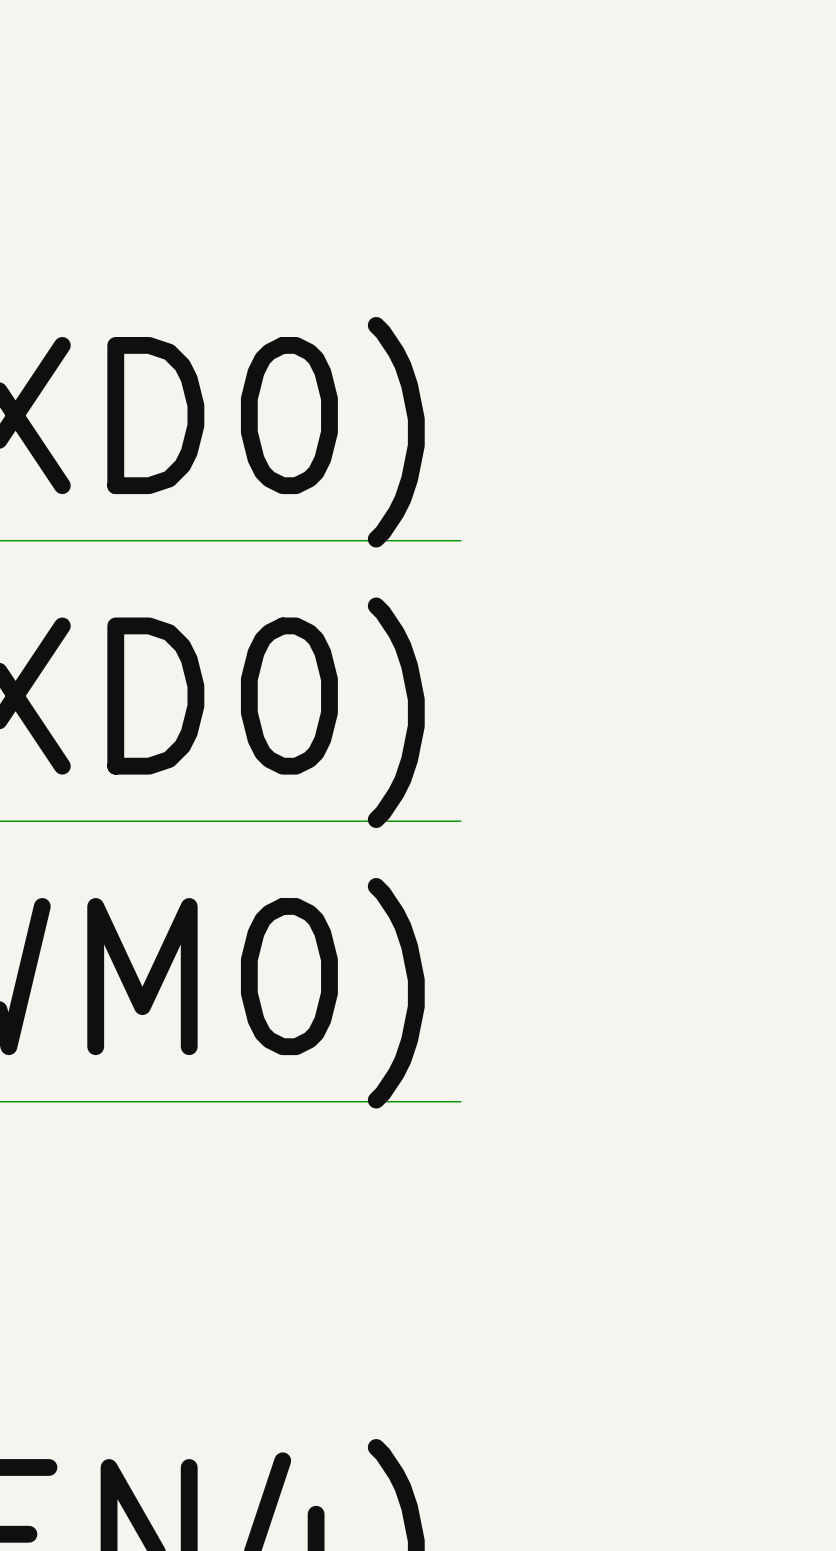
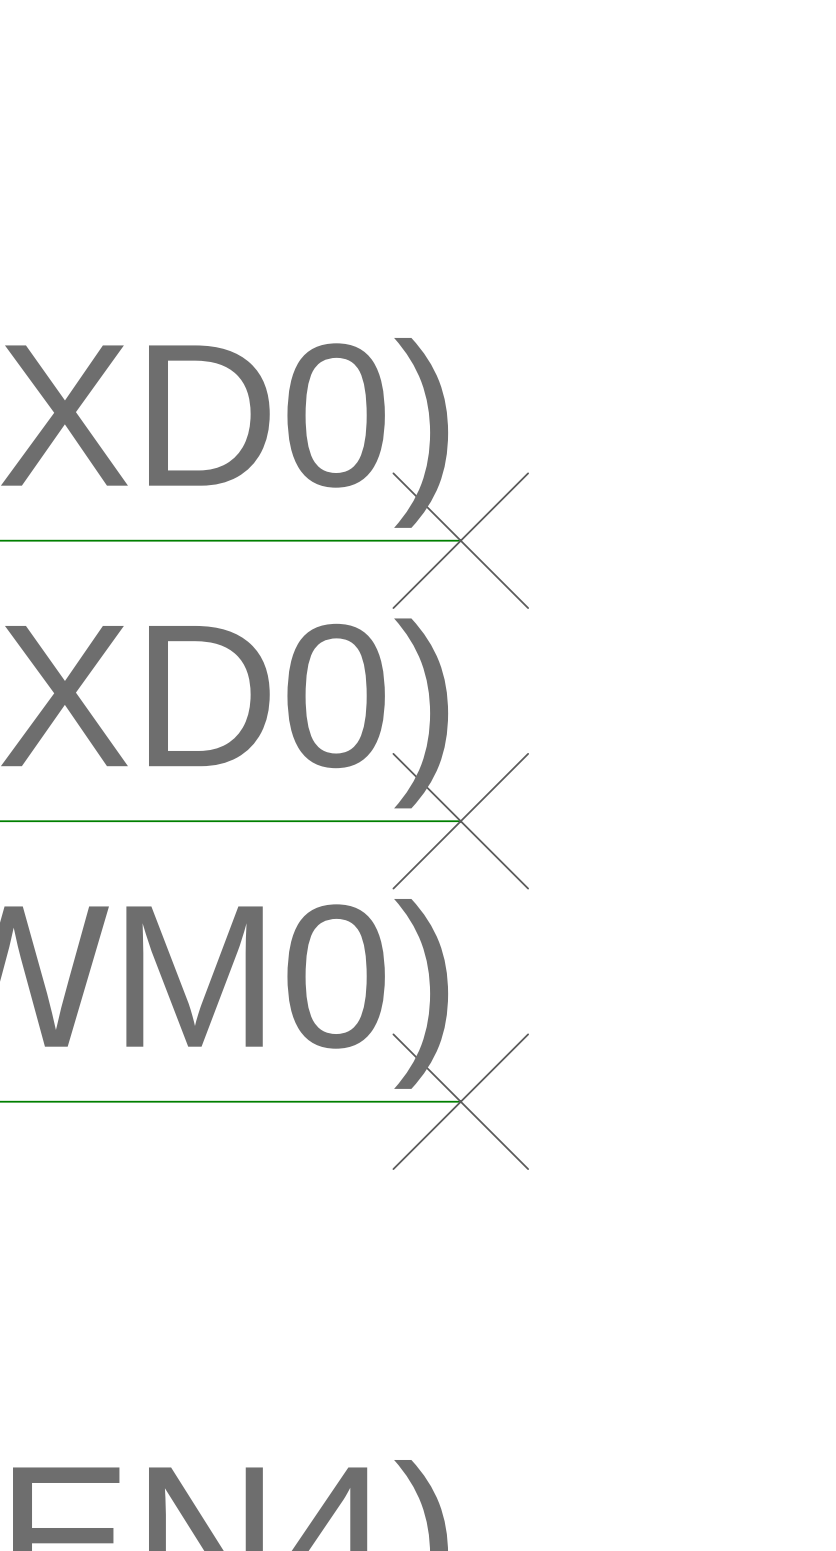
no-connect mark: none -> (460, 540)
no-connect mark: none -> (460, 821)
no-connect mark: none -> (460, 1101)

